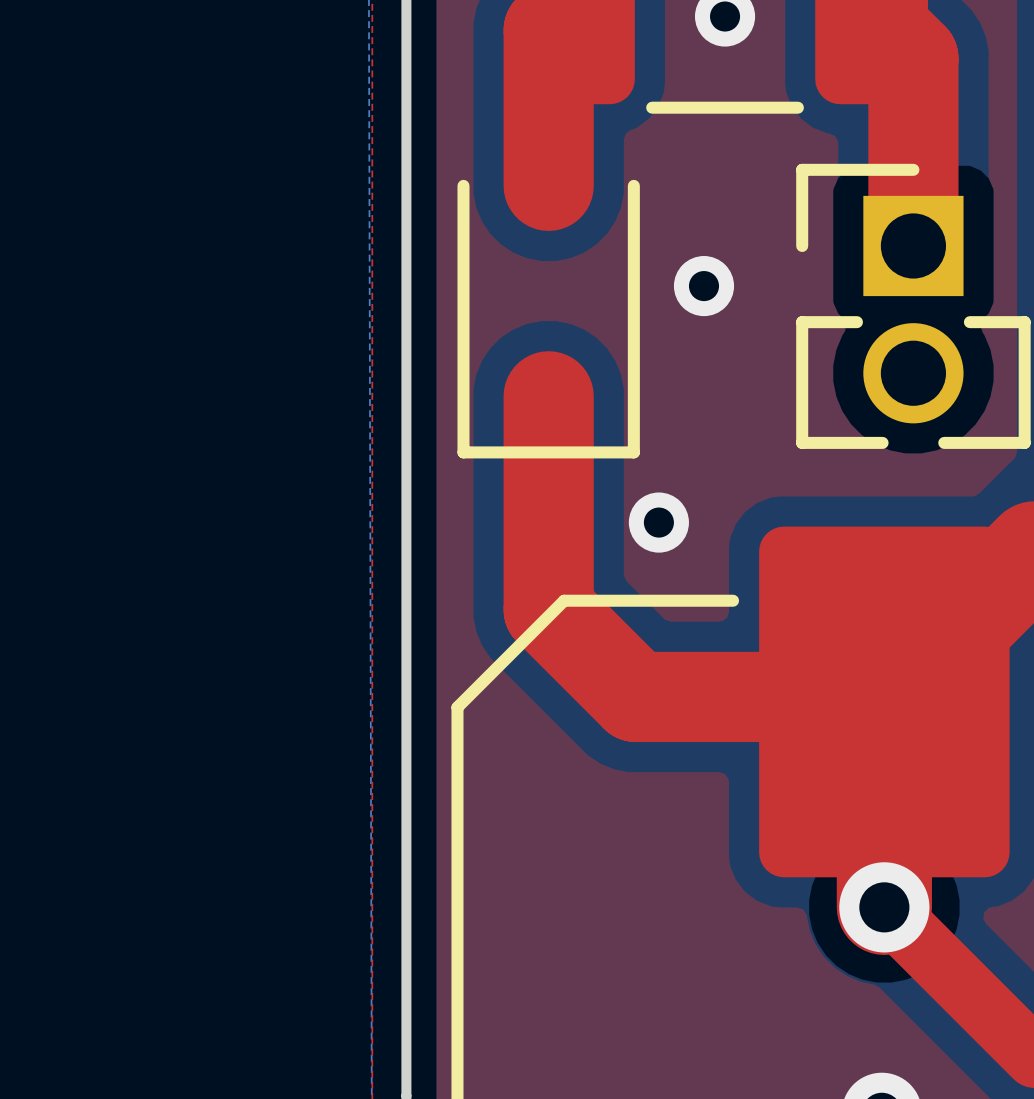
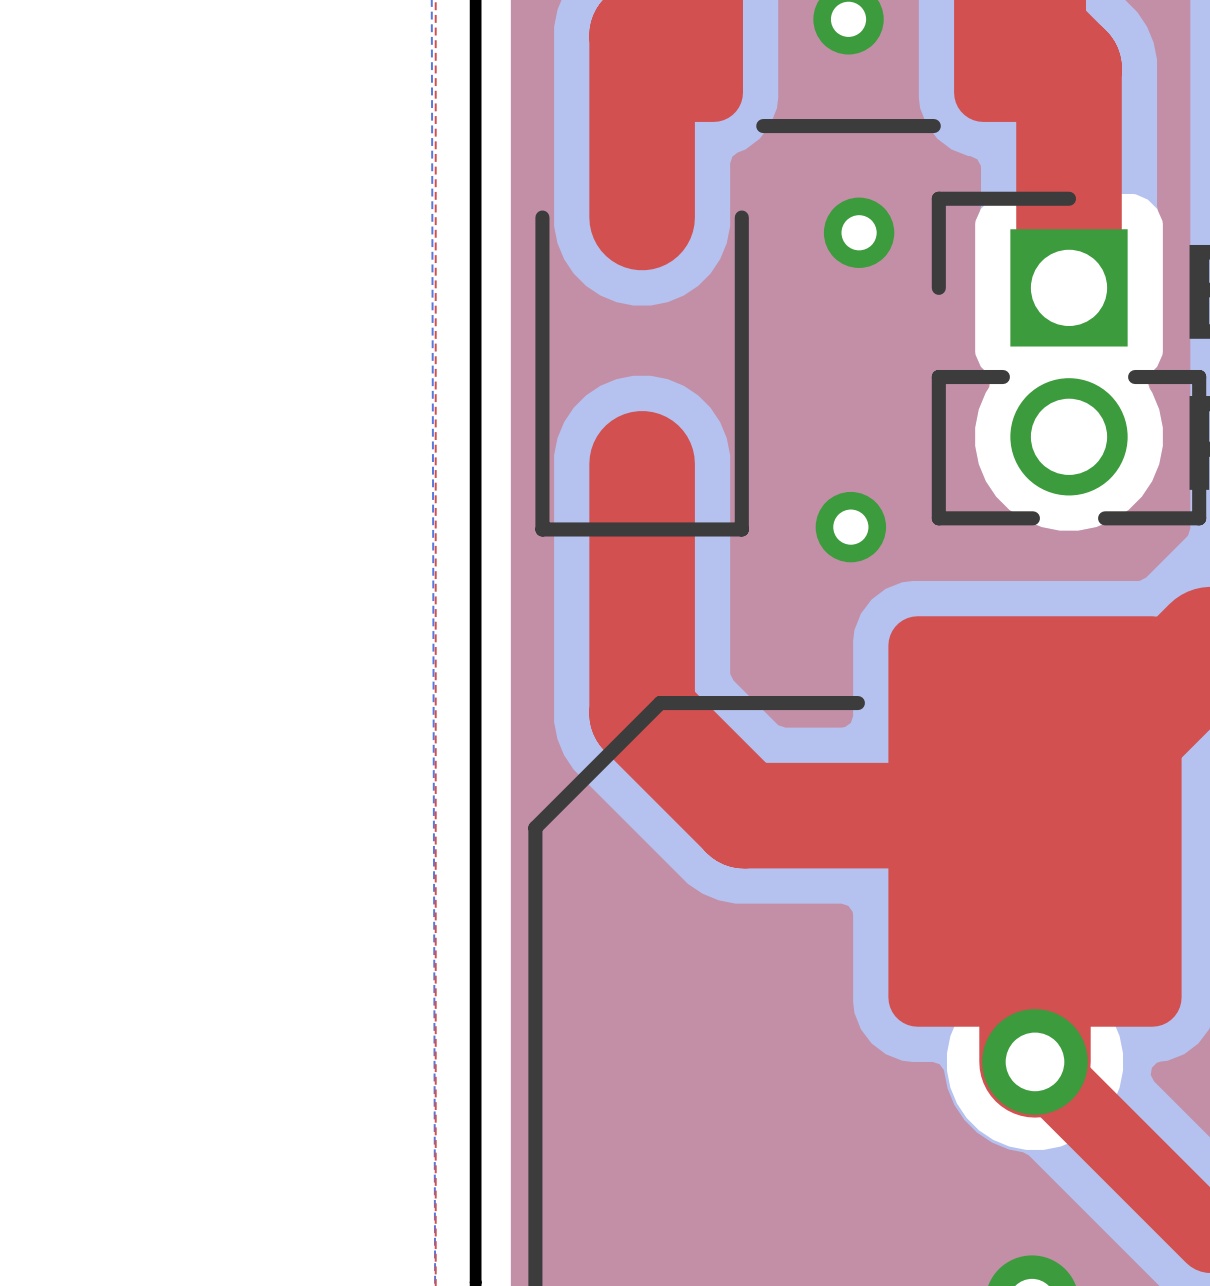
via: none -> (859, 232)
via: (703, 286) -> none
via: none -> (850, 527)
via: (658, 522) -> none

